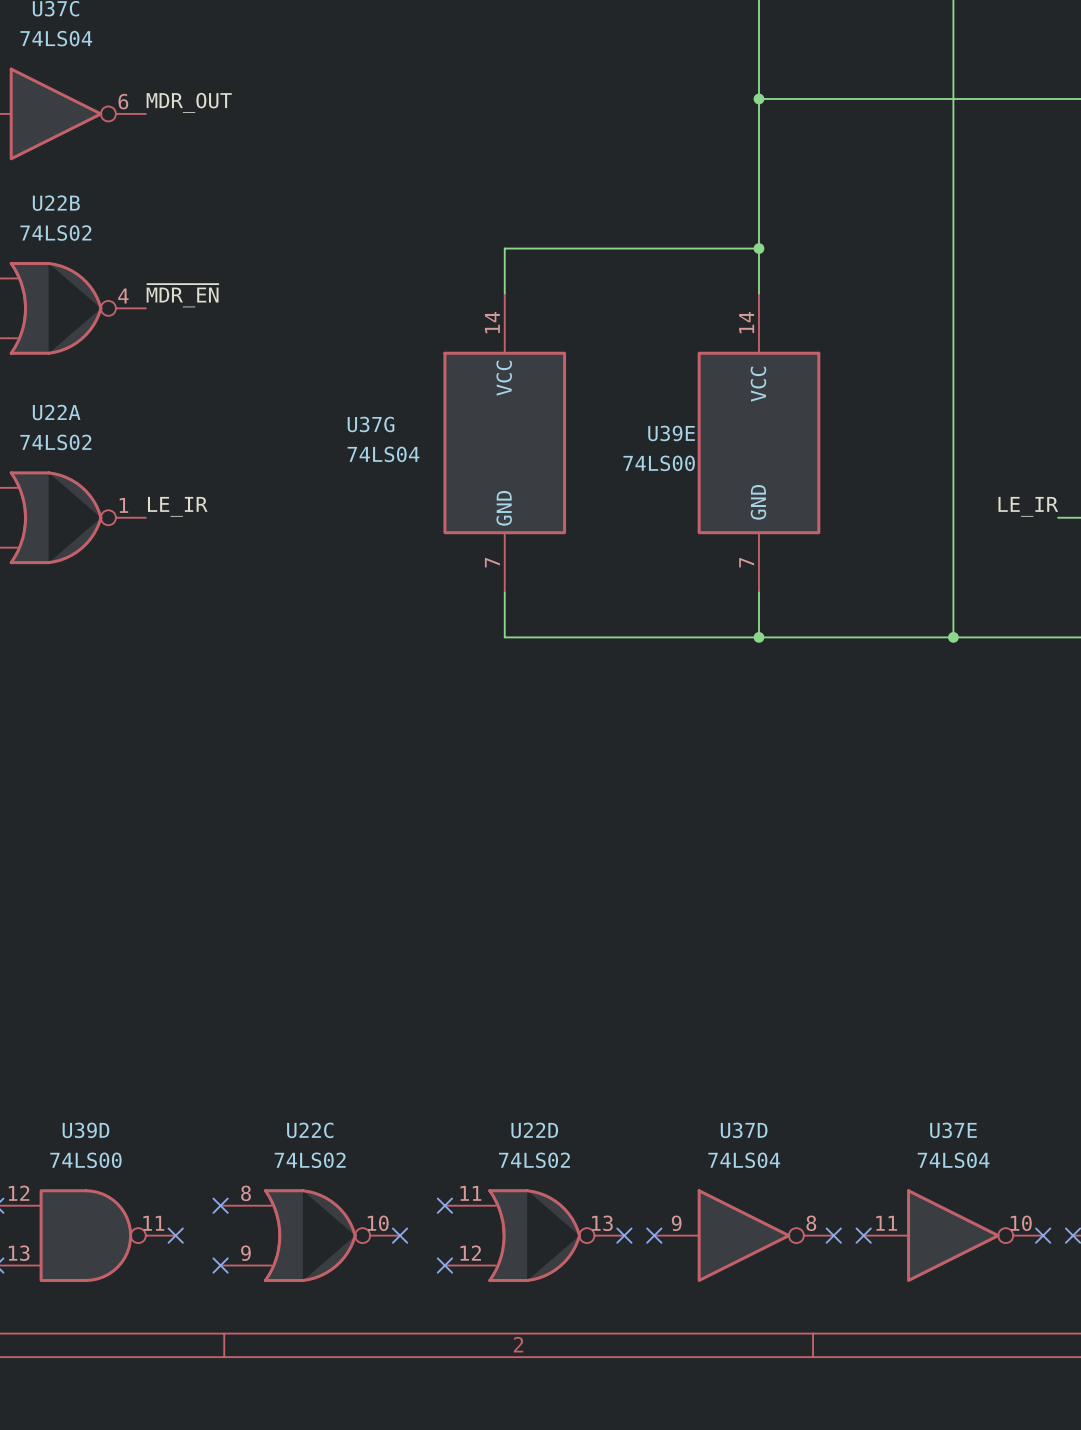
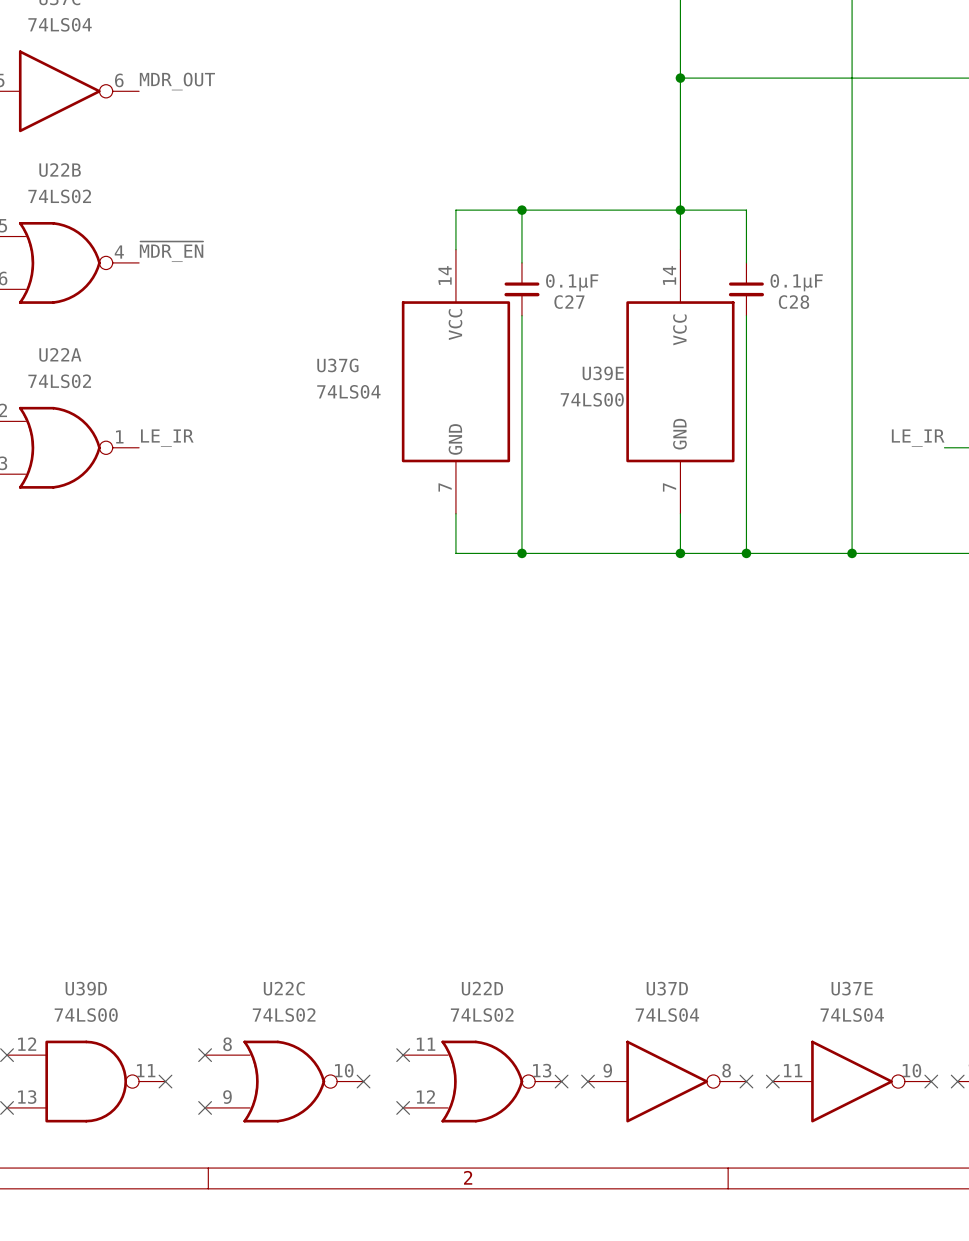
wire: none -> (521, 210) (521, 262)
junction: none -> (521, 210)
wire: none -> (680, 210) (746, 210) (746, 262)
C27: none -> 0.1µF (521, 289)
C28: none -> 0.1µF (746, 289)
wire: none -> (521, 315) (521, 553)
wire: none -> (746, 315) (746, 553)
junction: none -> (521, 553)
junction: none -> (746, 553)

